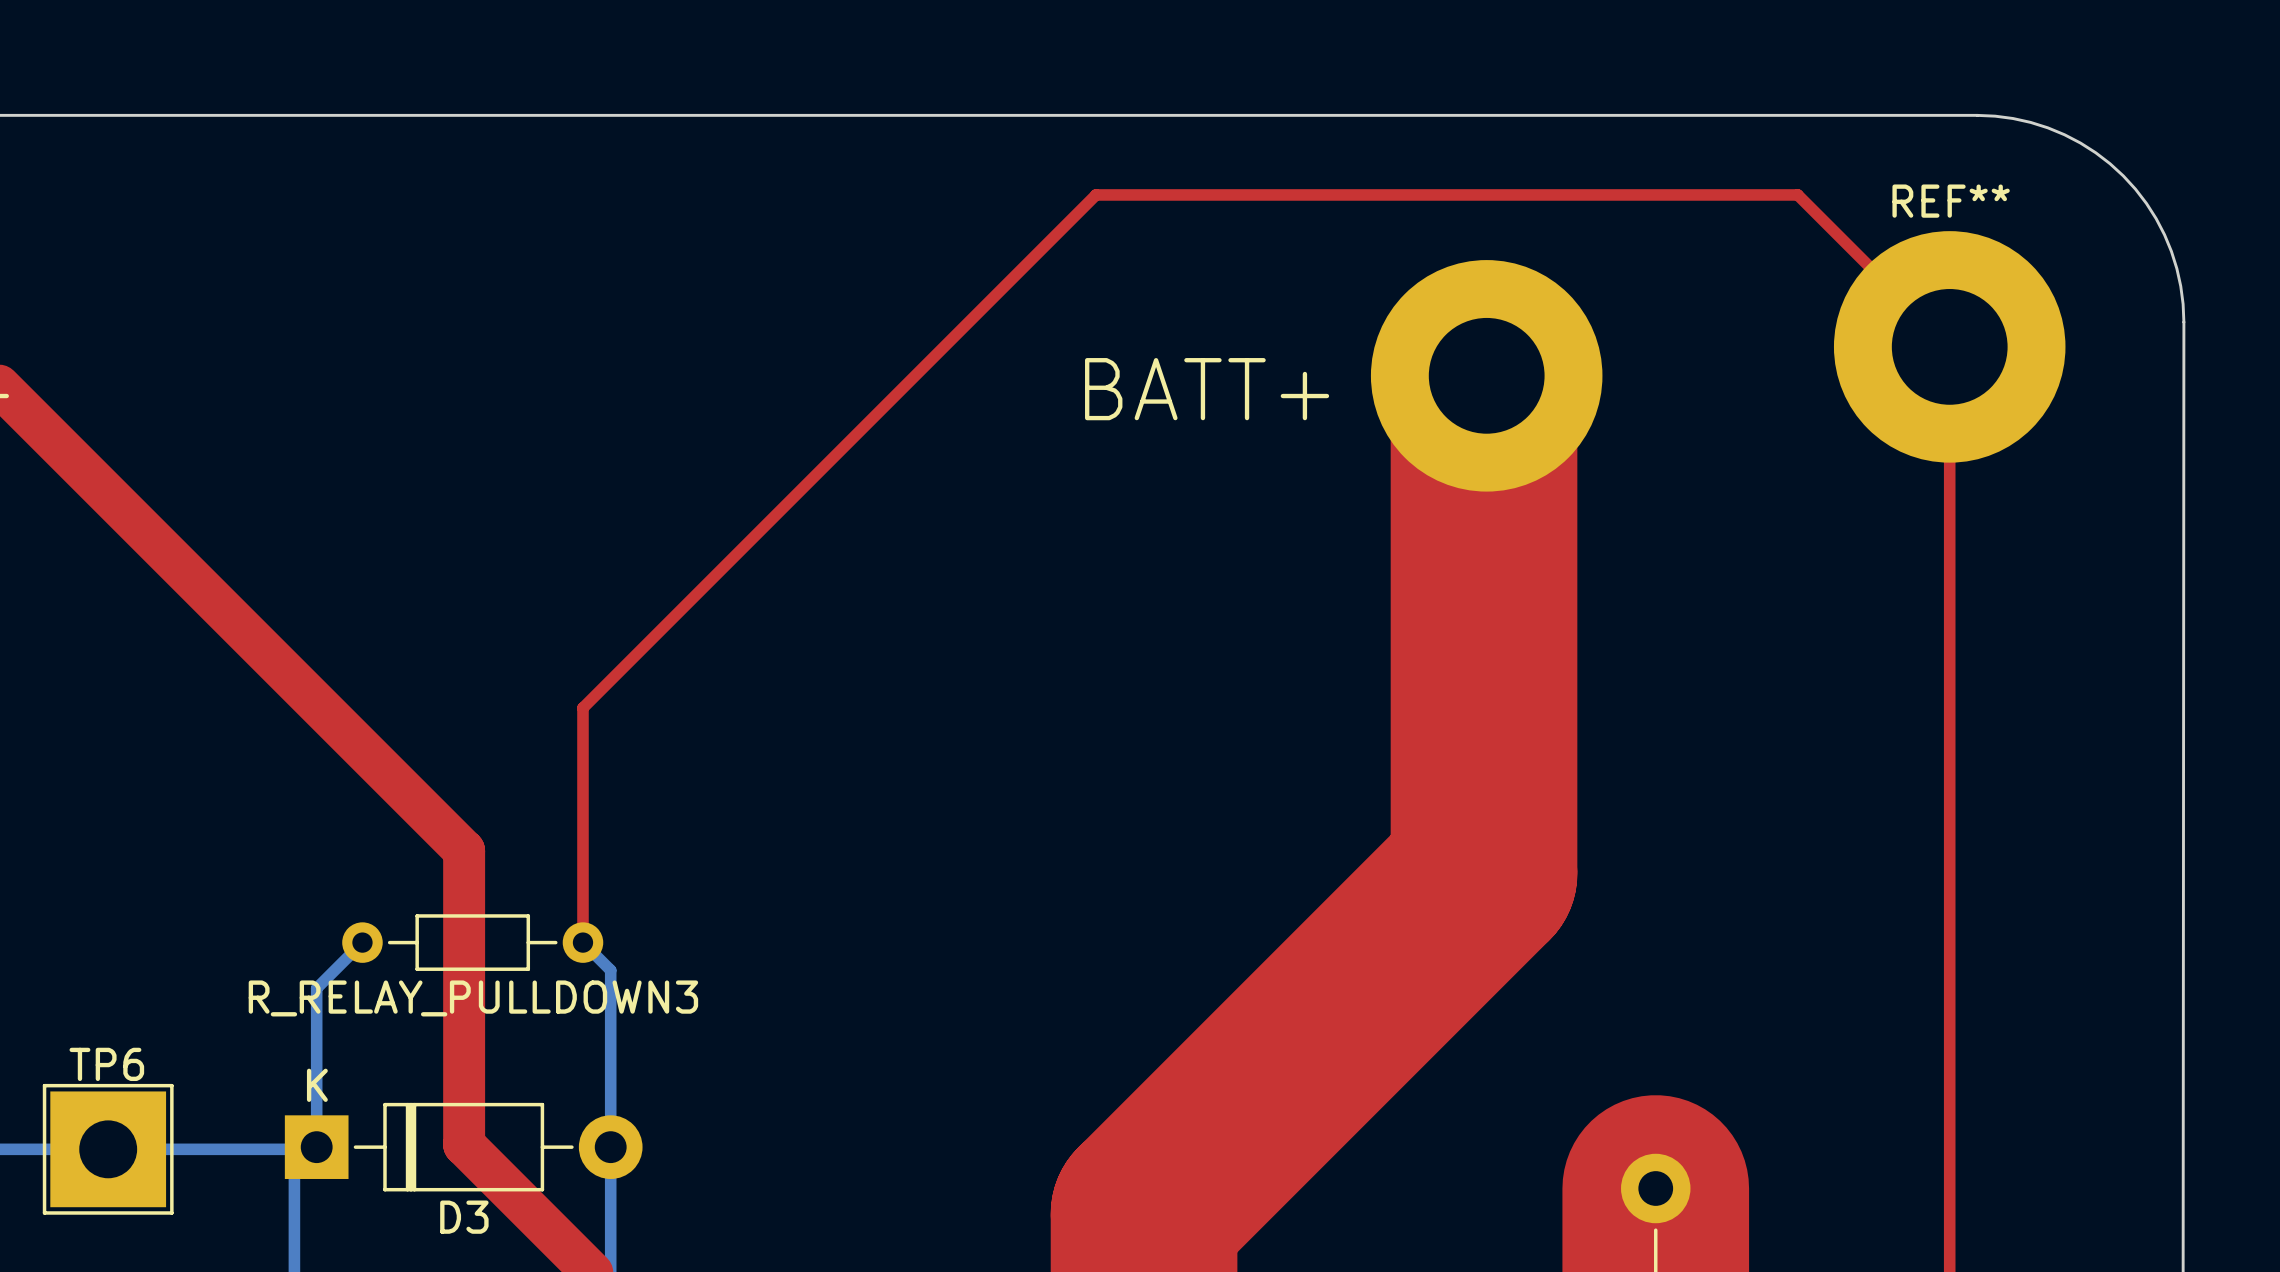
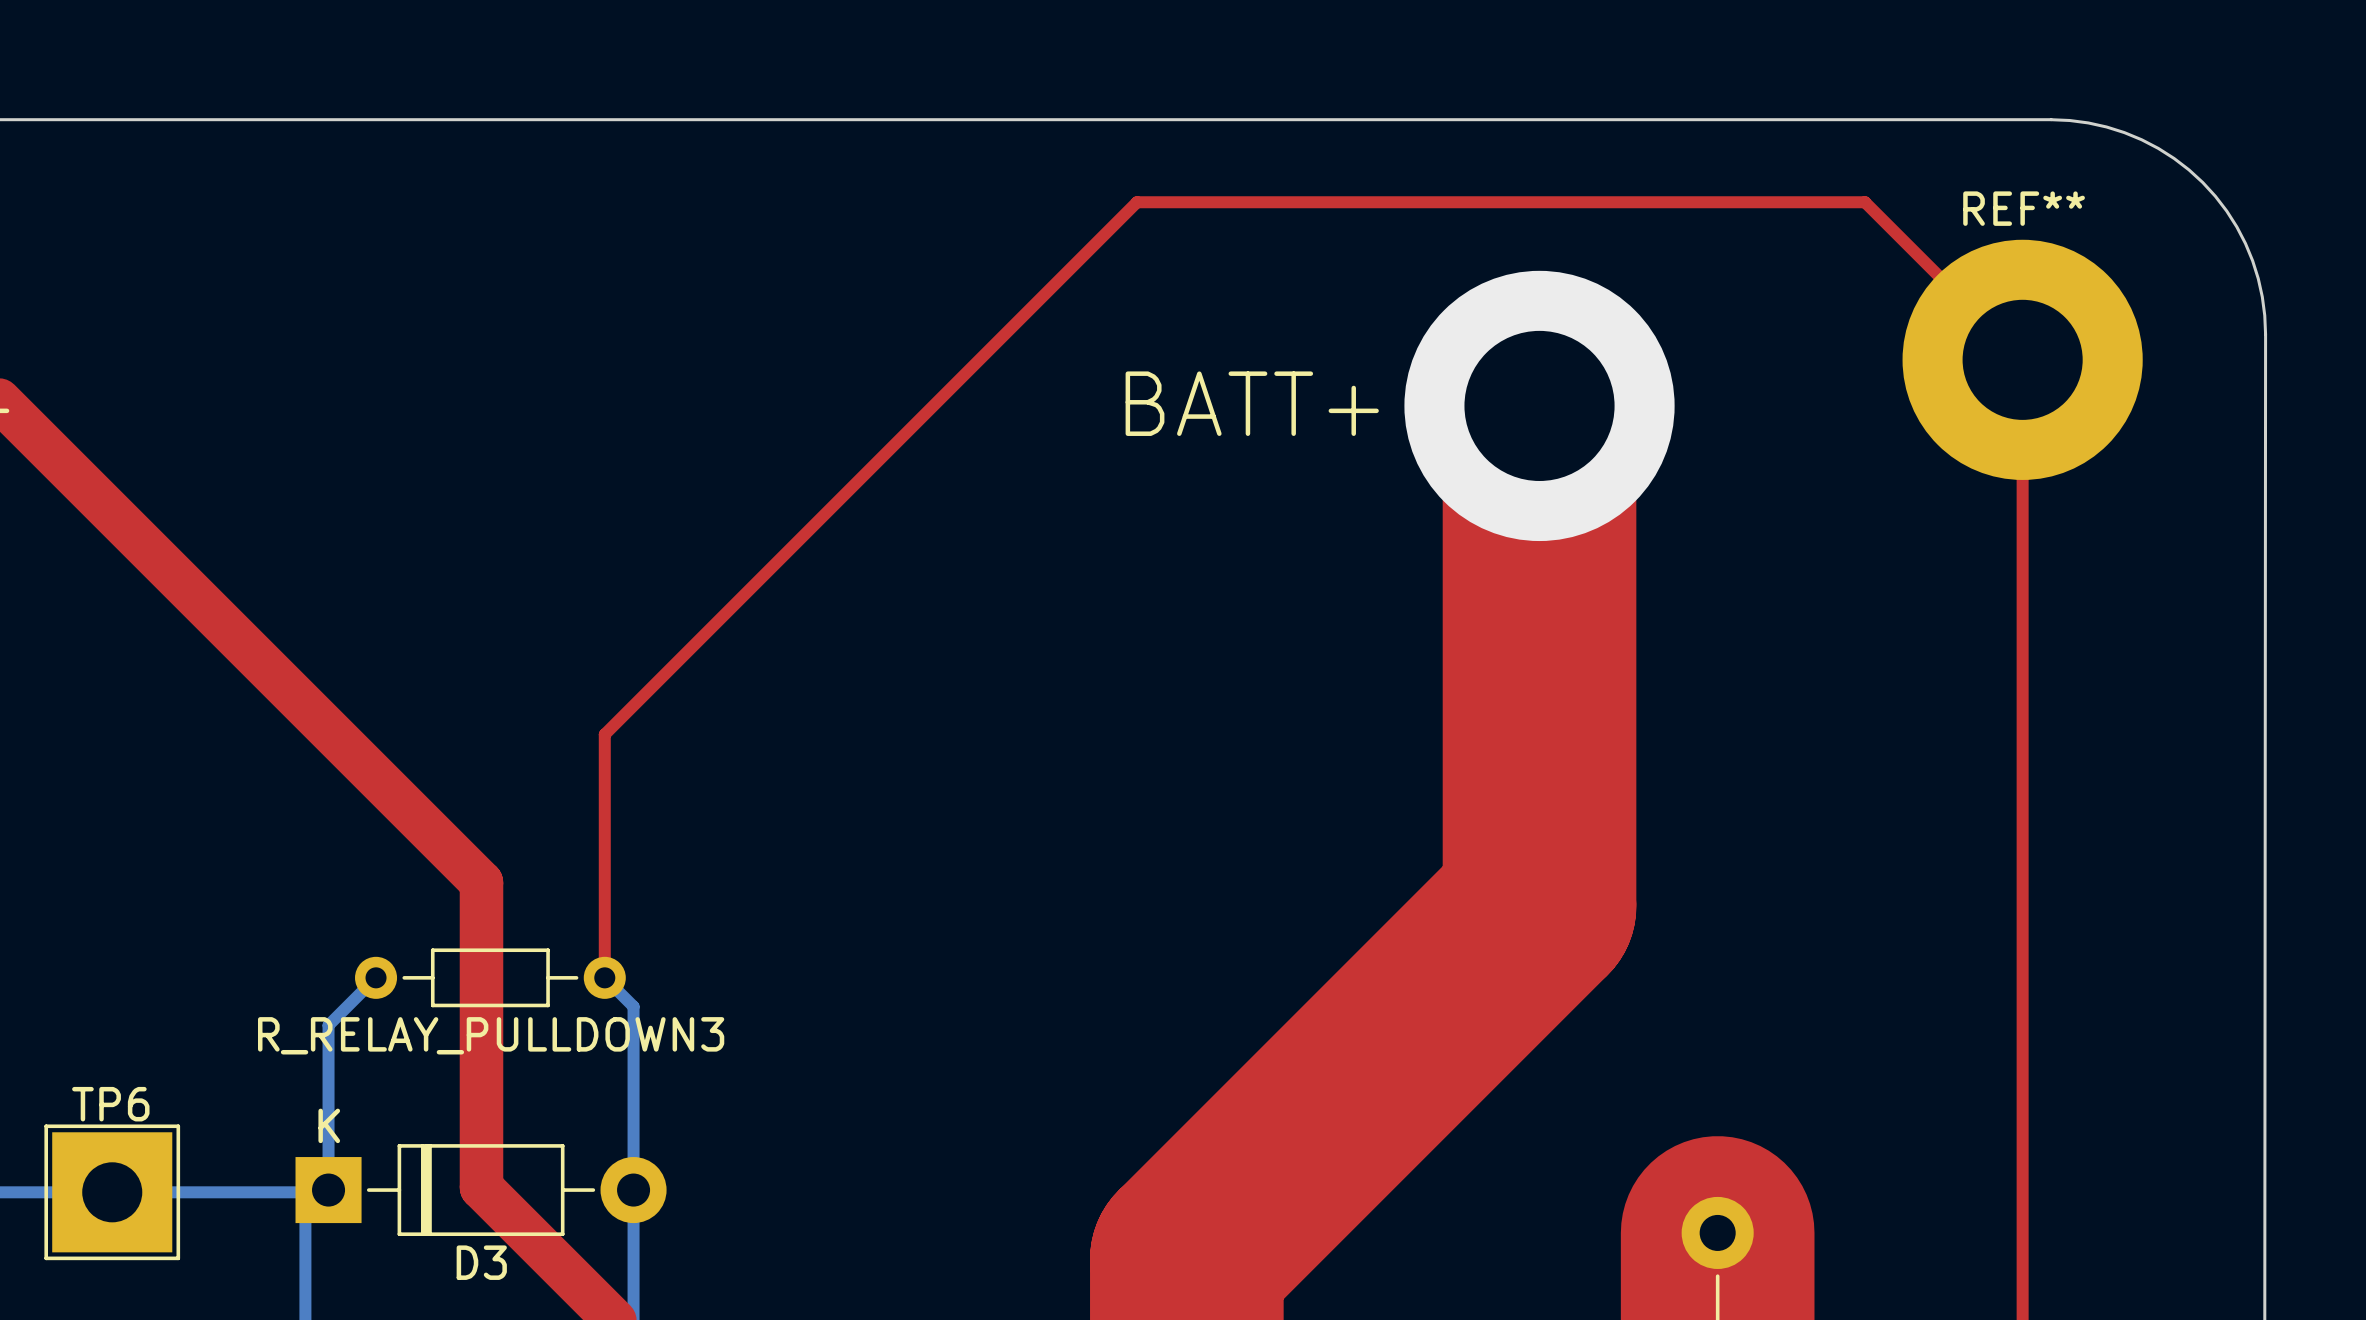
part: (1486, 375) -> none
via: none -> (1539, 405)

